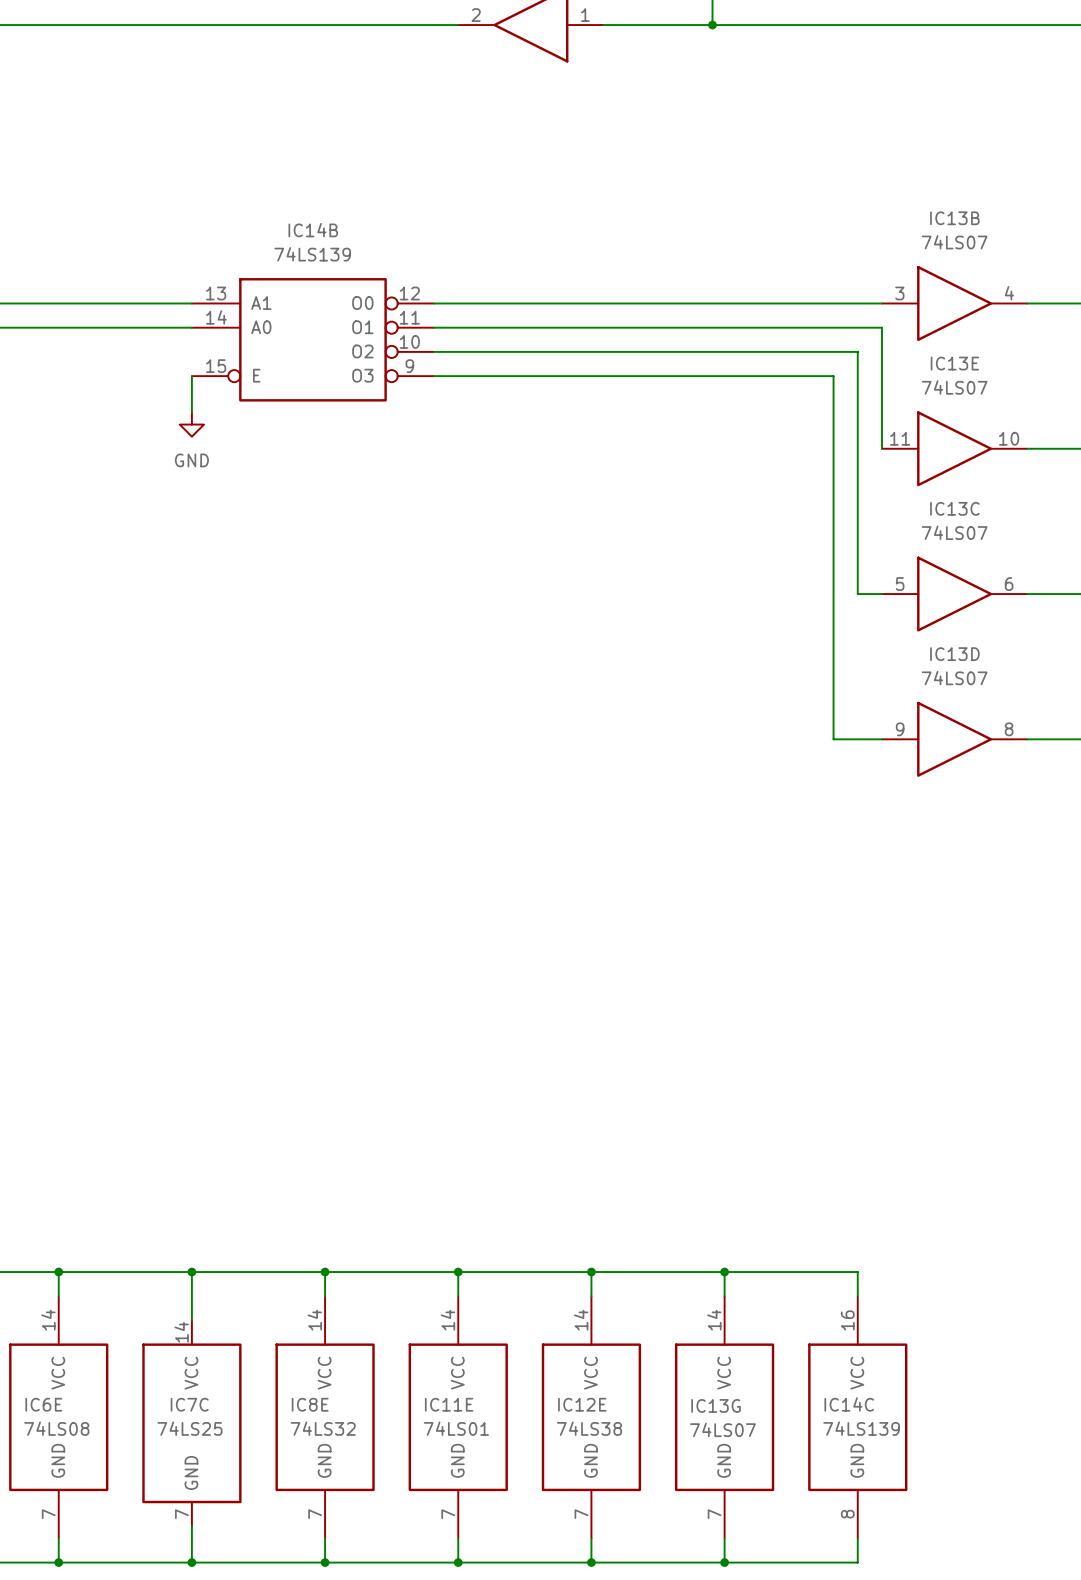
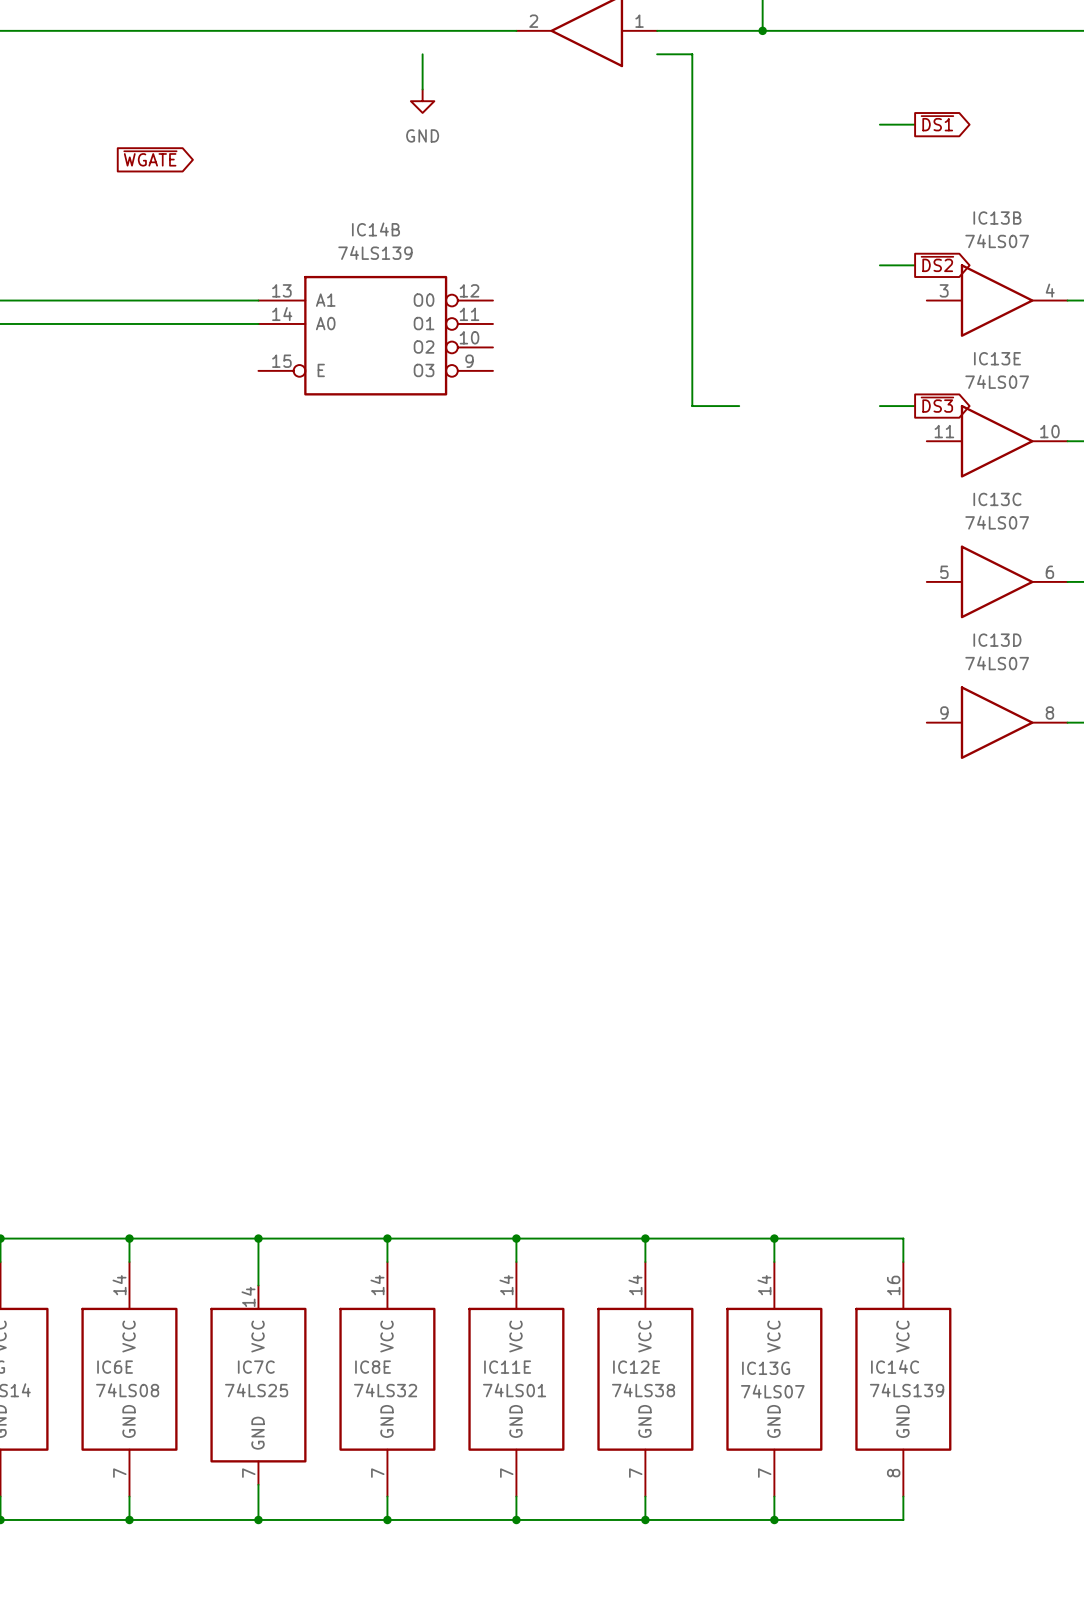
wire: none -> (422, 54) (422, 89)
wire: none -> (657, 54) (692, 54) (692, 406) (739, 406)
power symbol: none -> GND (422, 101)
global label: none -> ~{DS1} (937, 123)
wire: none -> (879, 124) (915, 124)
global label: none -> ~{WGATE} (150, 158)
global label: none -> ~{DS2} (937, 264)
wire: none -> (879, 265) (915, 265)
wire: (434, 303) (881, 303) -> none
wire: (434, 327) (881, 327) (881, 448) -> none
wire: (434, 351) (857, 351) (857, 594) (881, 594) -> none
wire: (191, 376) (191, 412) -> none
wire: (434, 376) (833, 376) (833, 739) (881, 739) -> none
global label: none -> ~{DS3} (937, 404)
wire: none -> (879, 406) (915, 406)
power symbol: GND (191, 424) -> none

